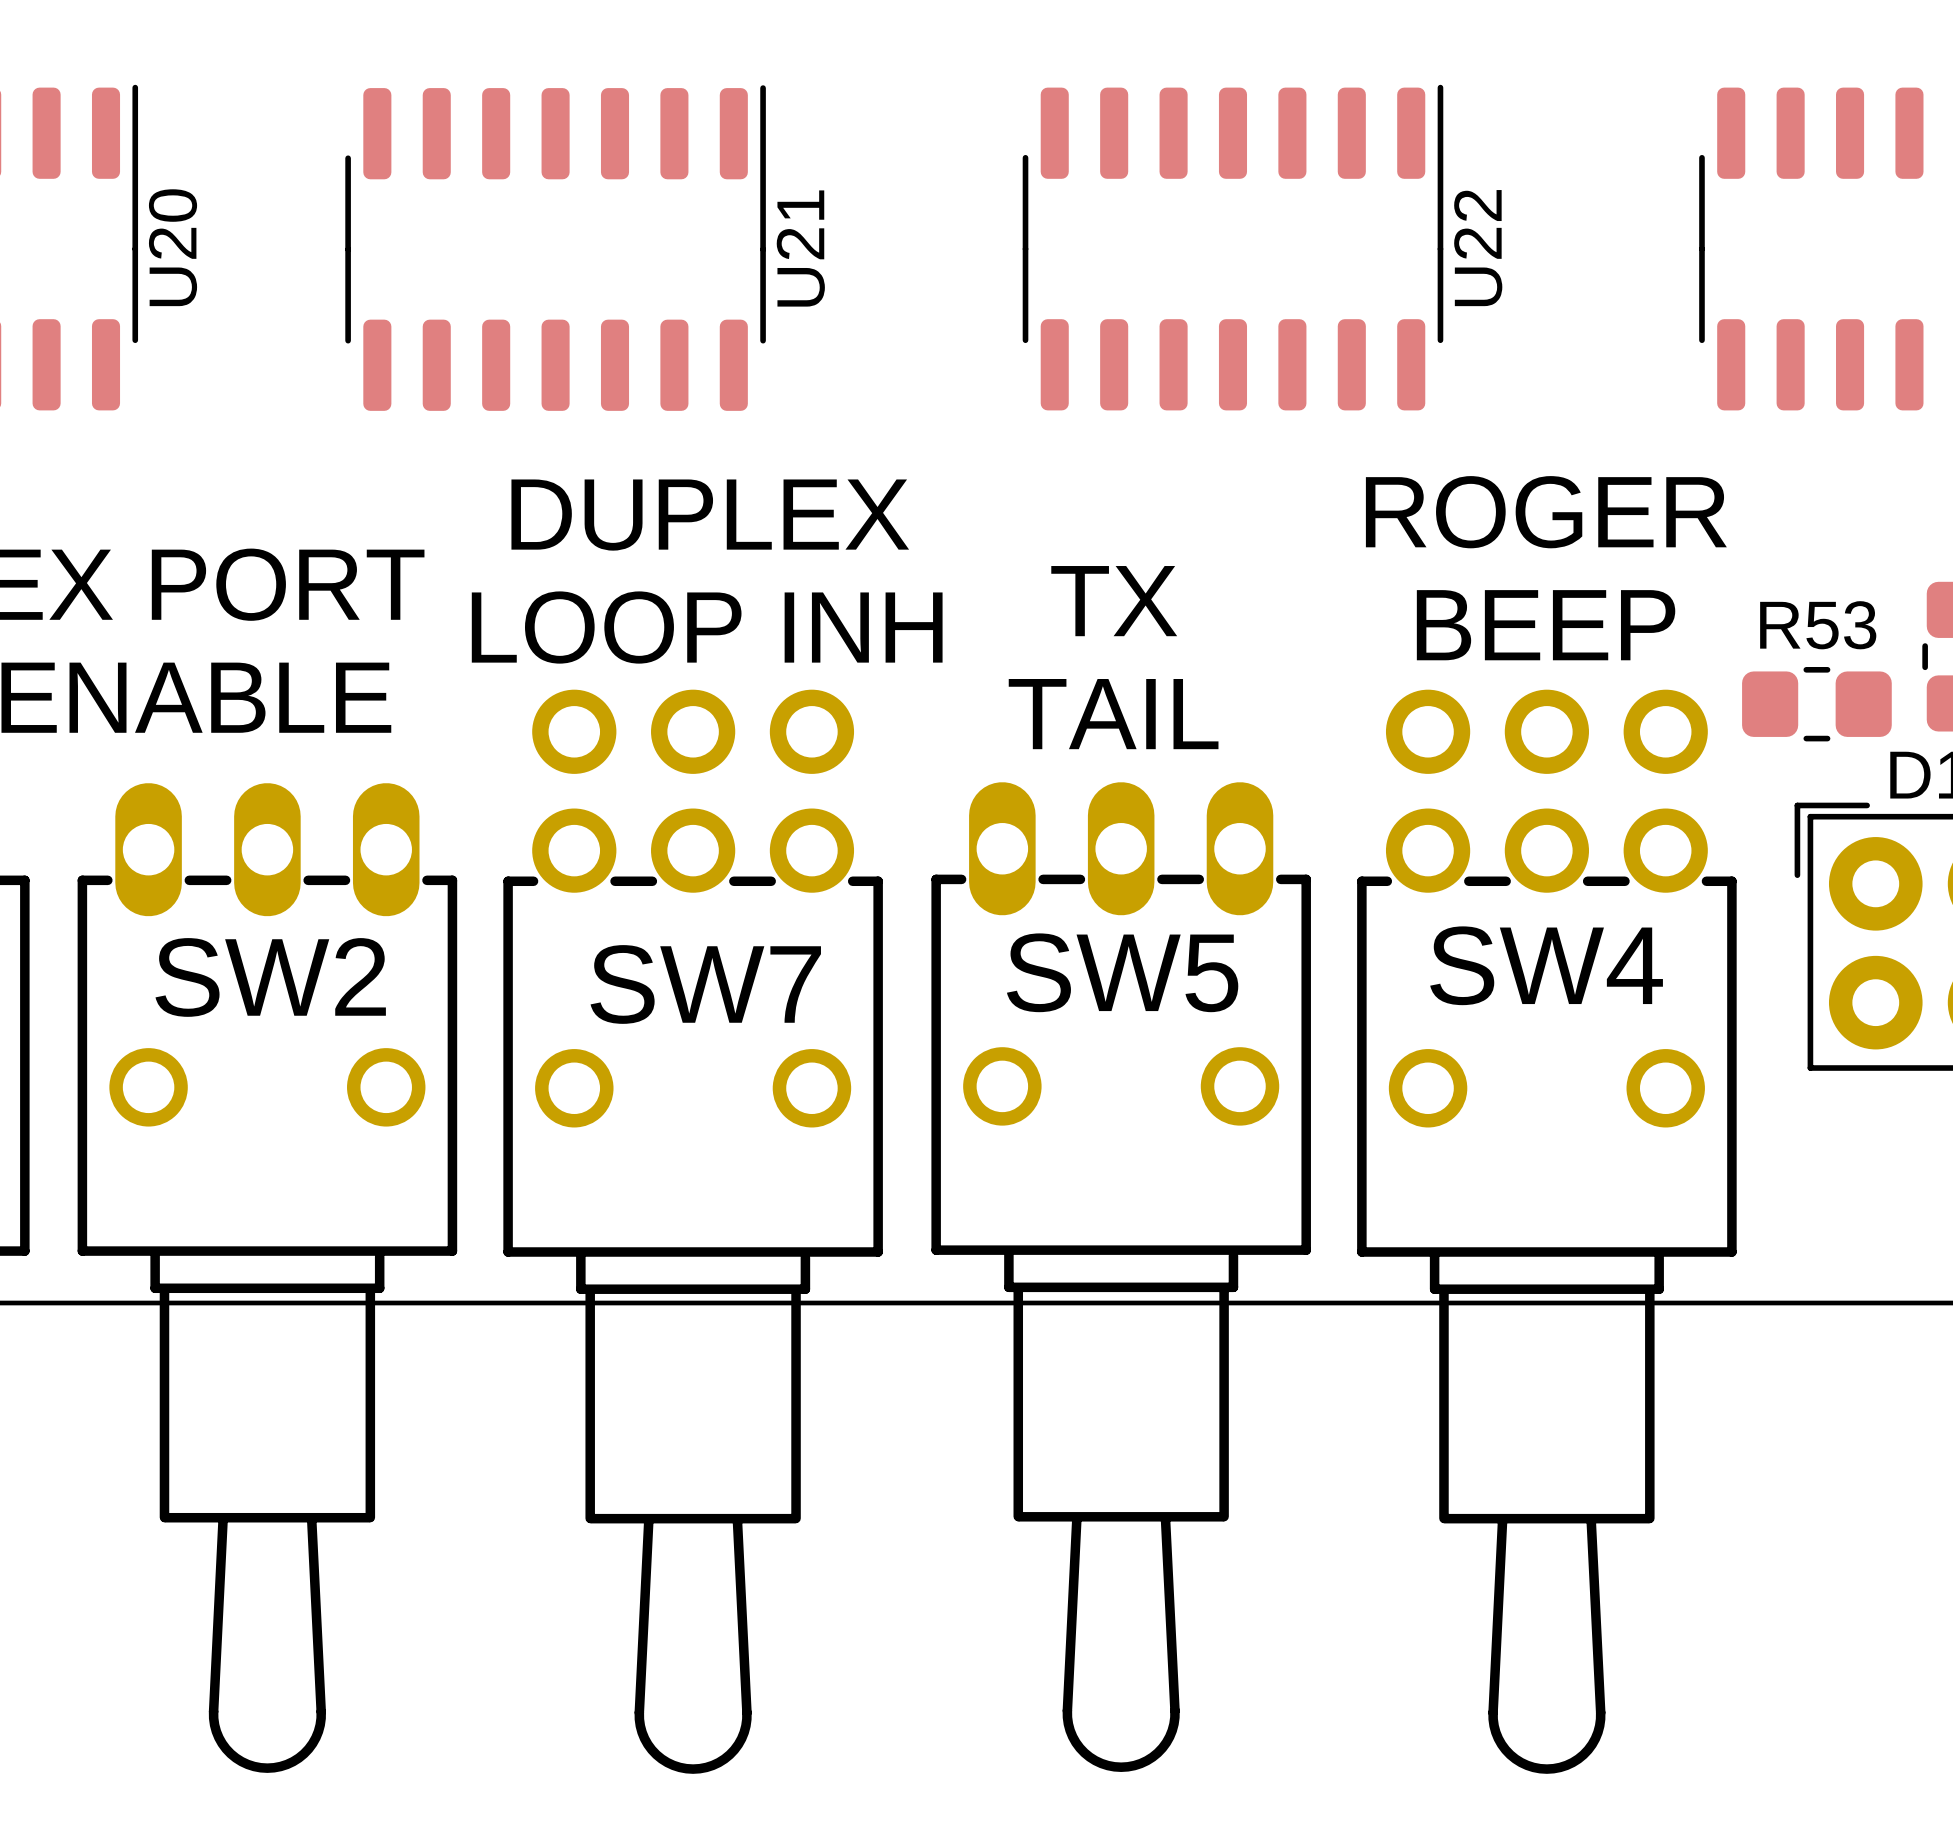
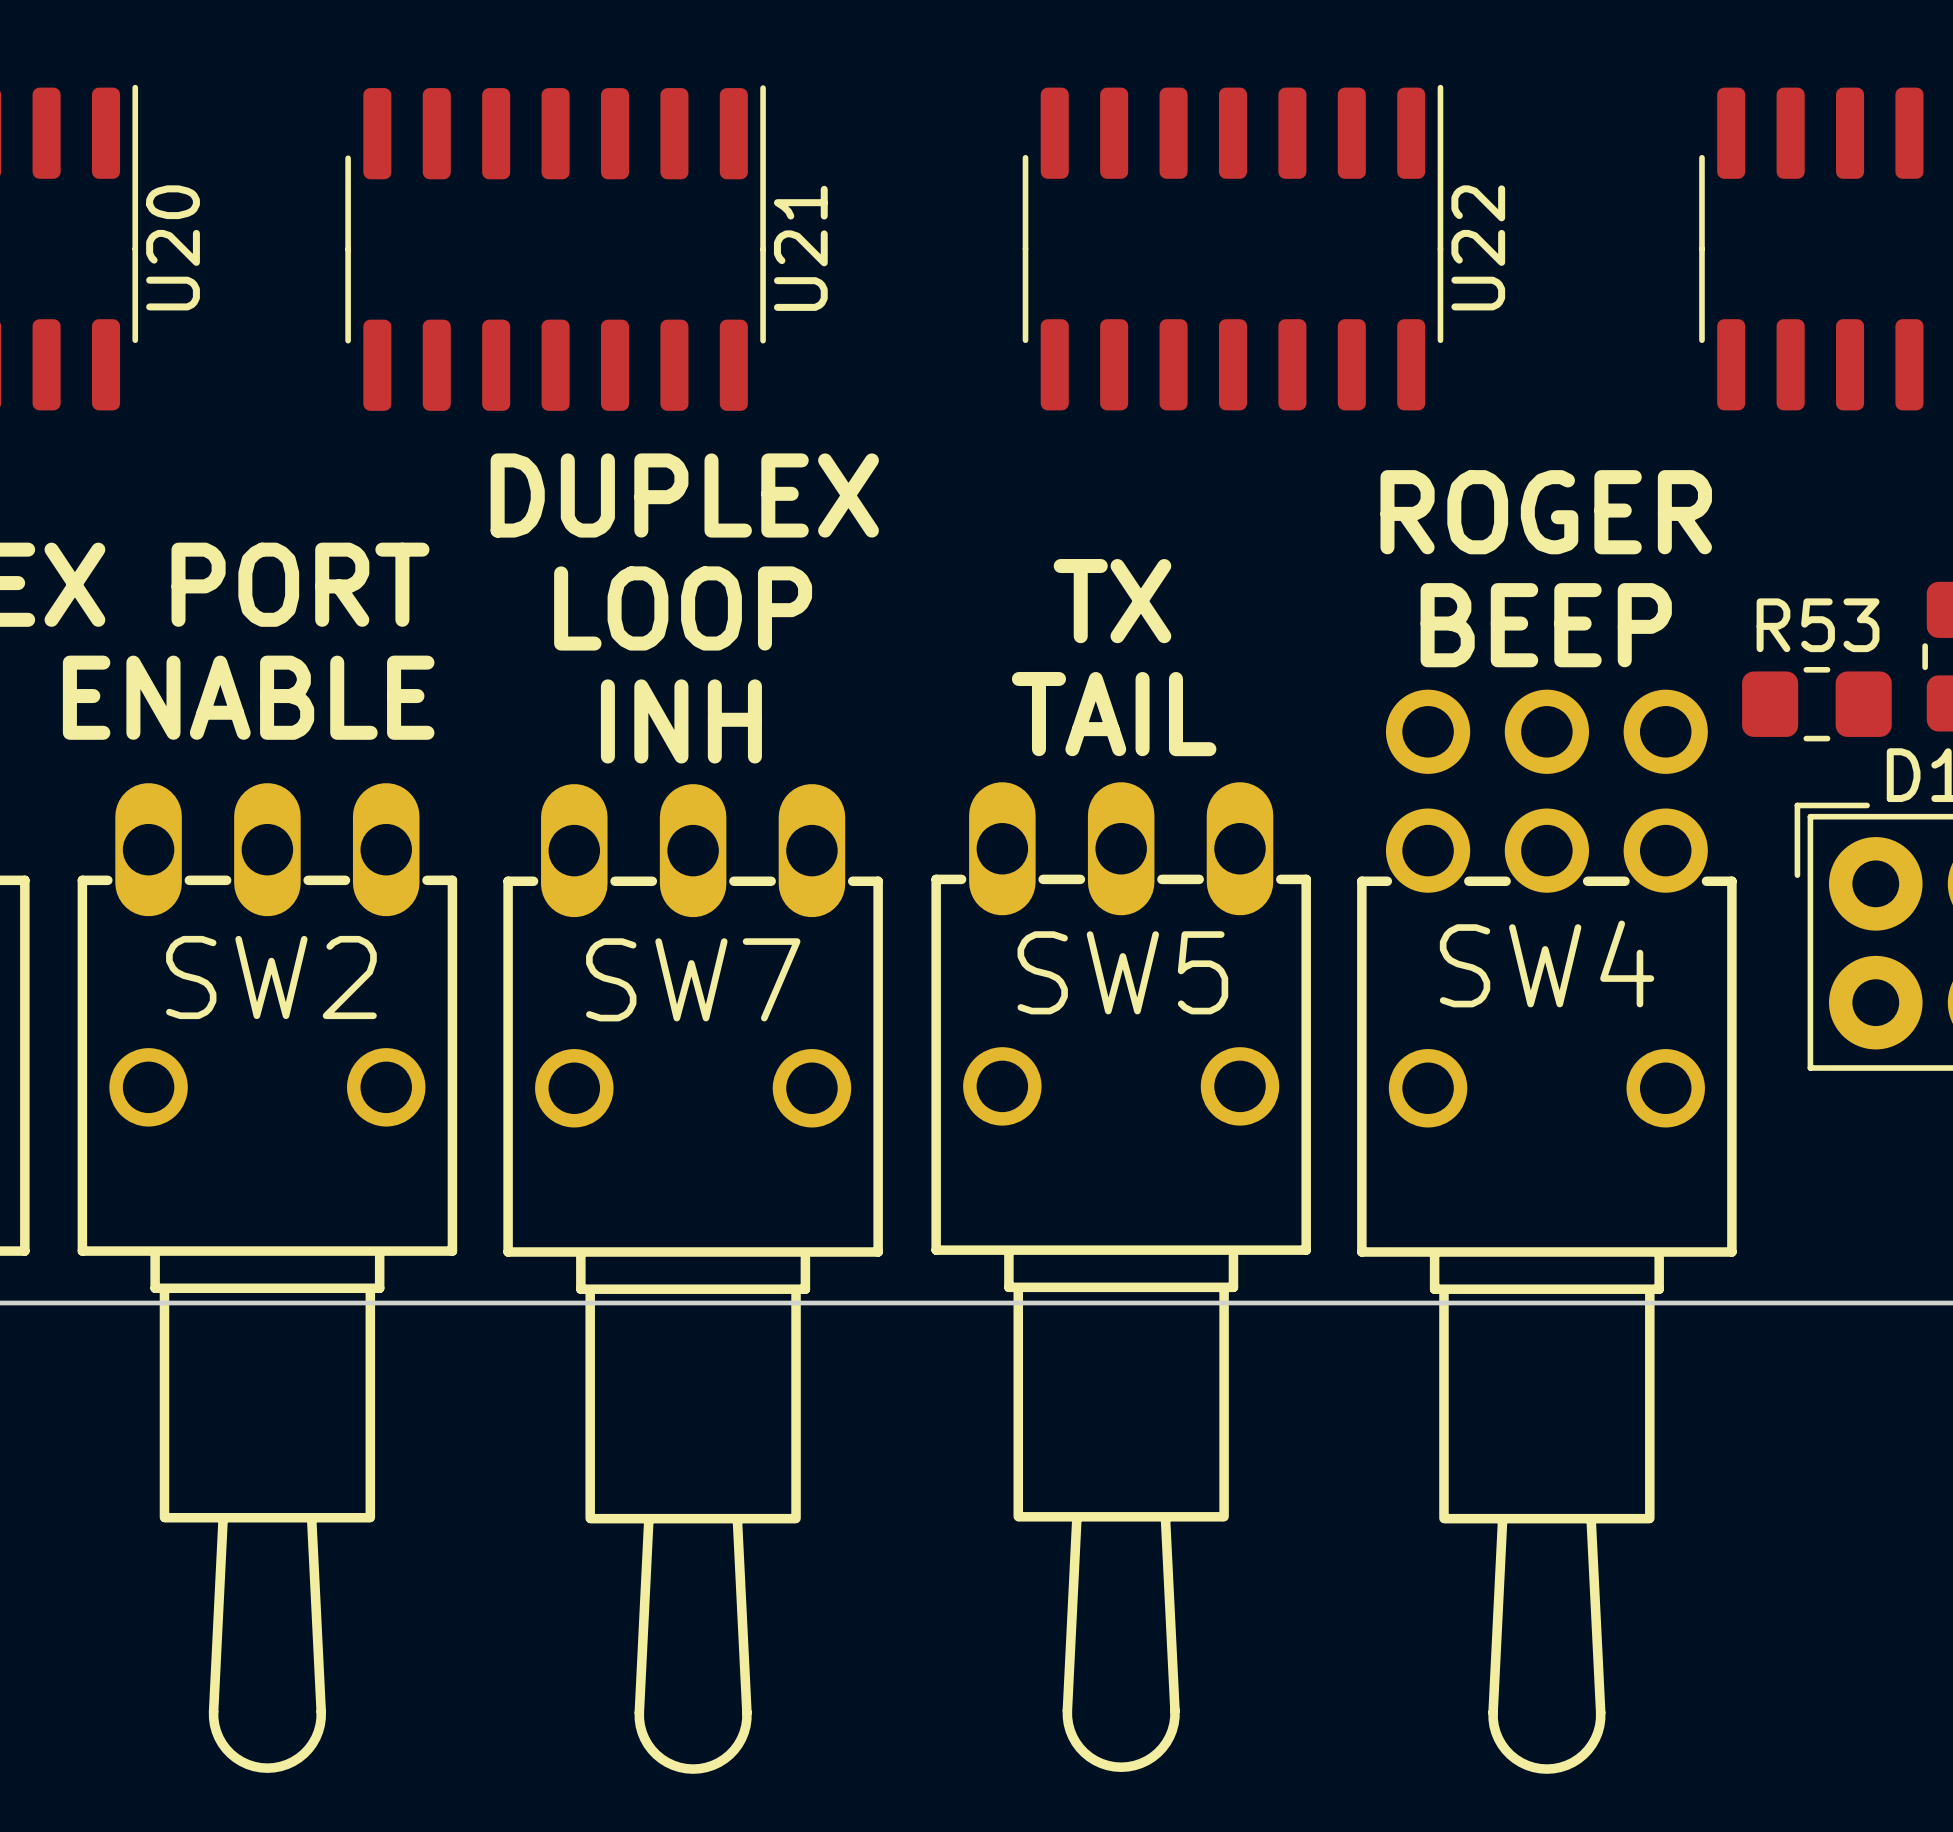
text position: DUPLEX (710, 515) -> DUPLEX (684, 495)
text: LOOP INH (707, 627) -> LOOP (683, 608)
SW7 footprint: [503, 689, 883, 1774] -> [503, 784, 883, 1774]
text: none -> INH (681, 721)

